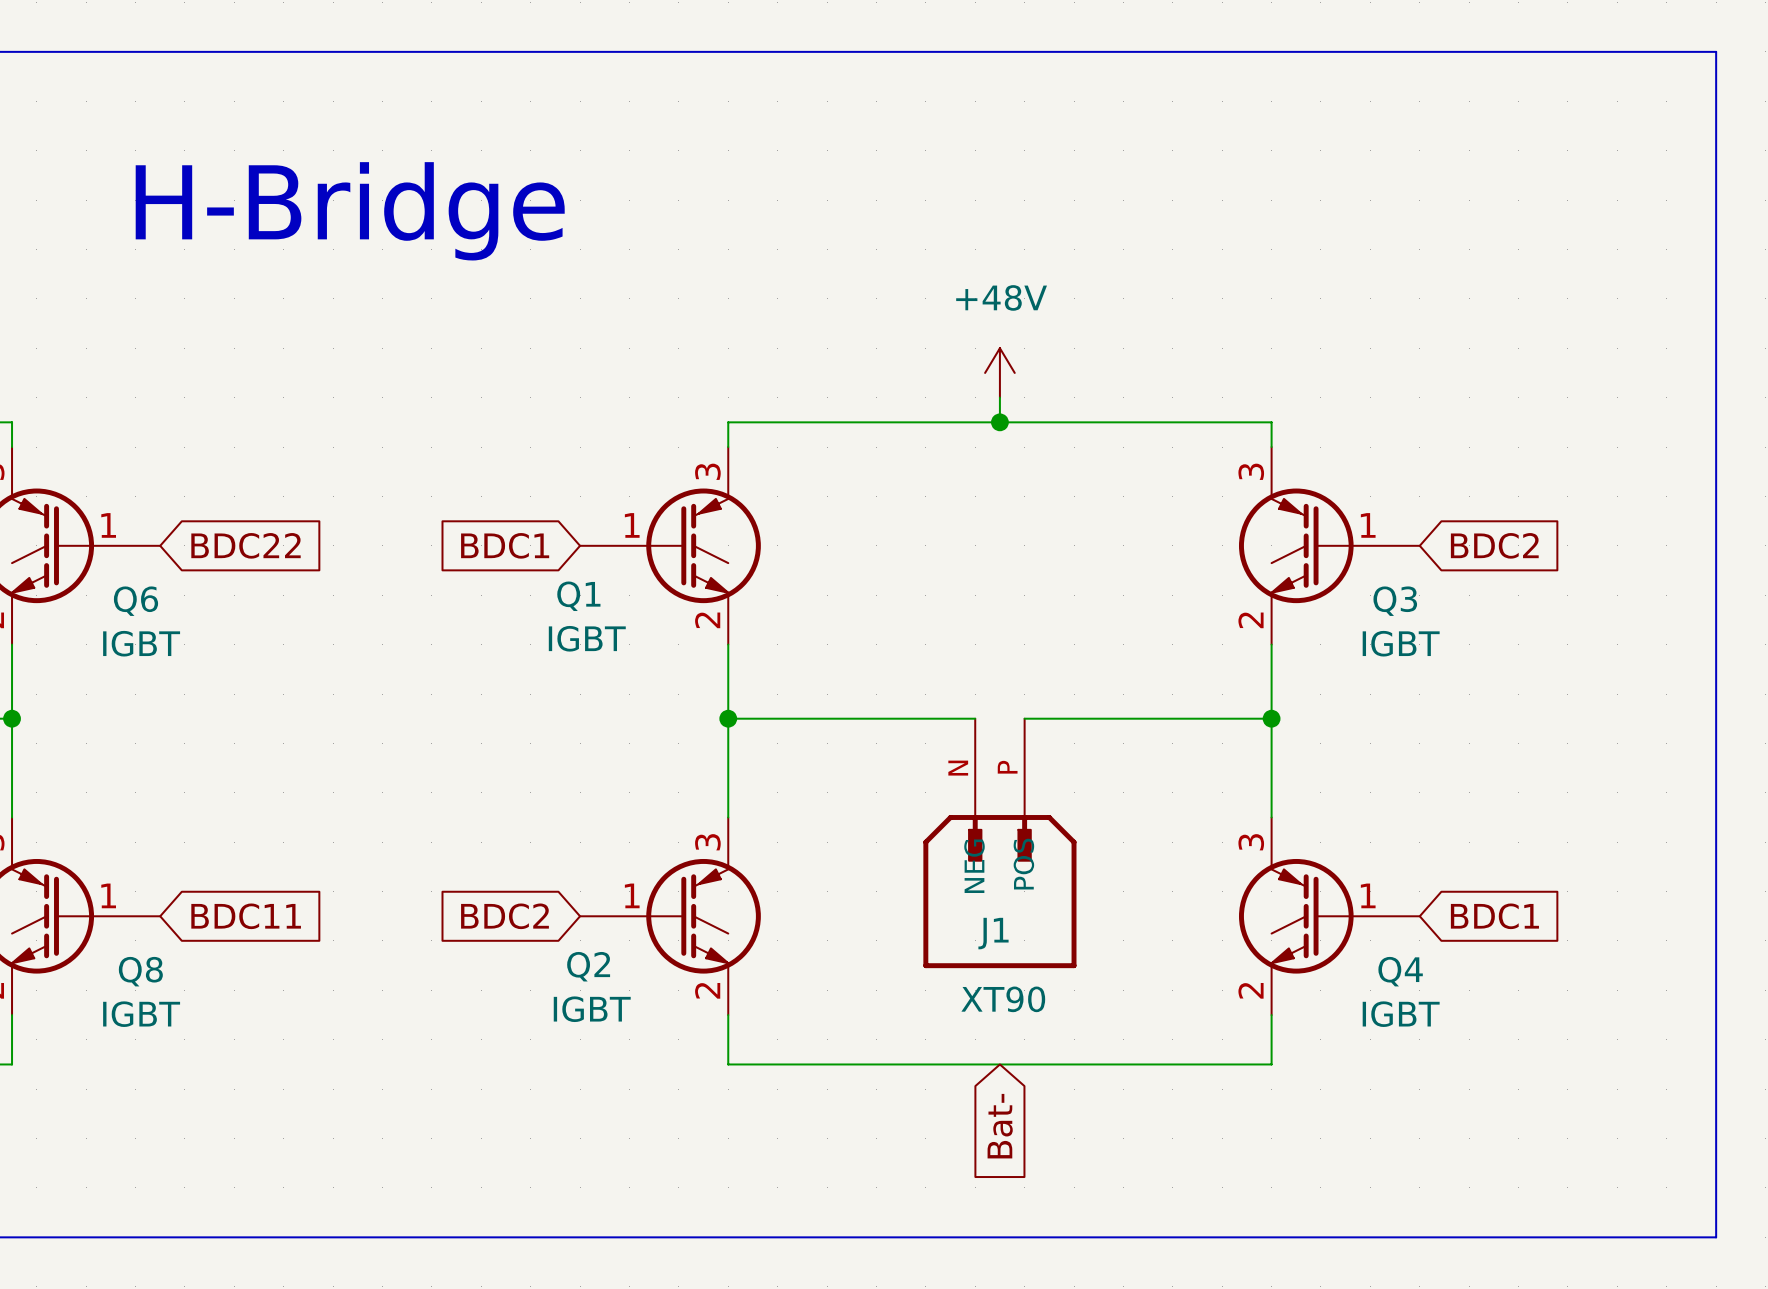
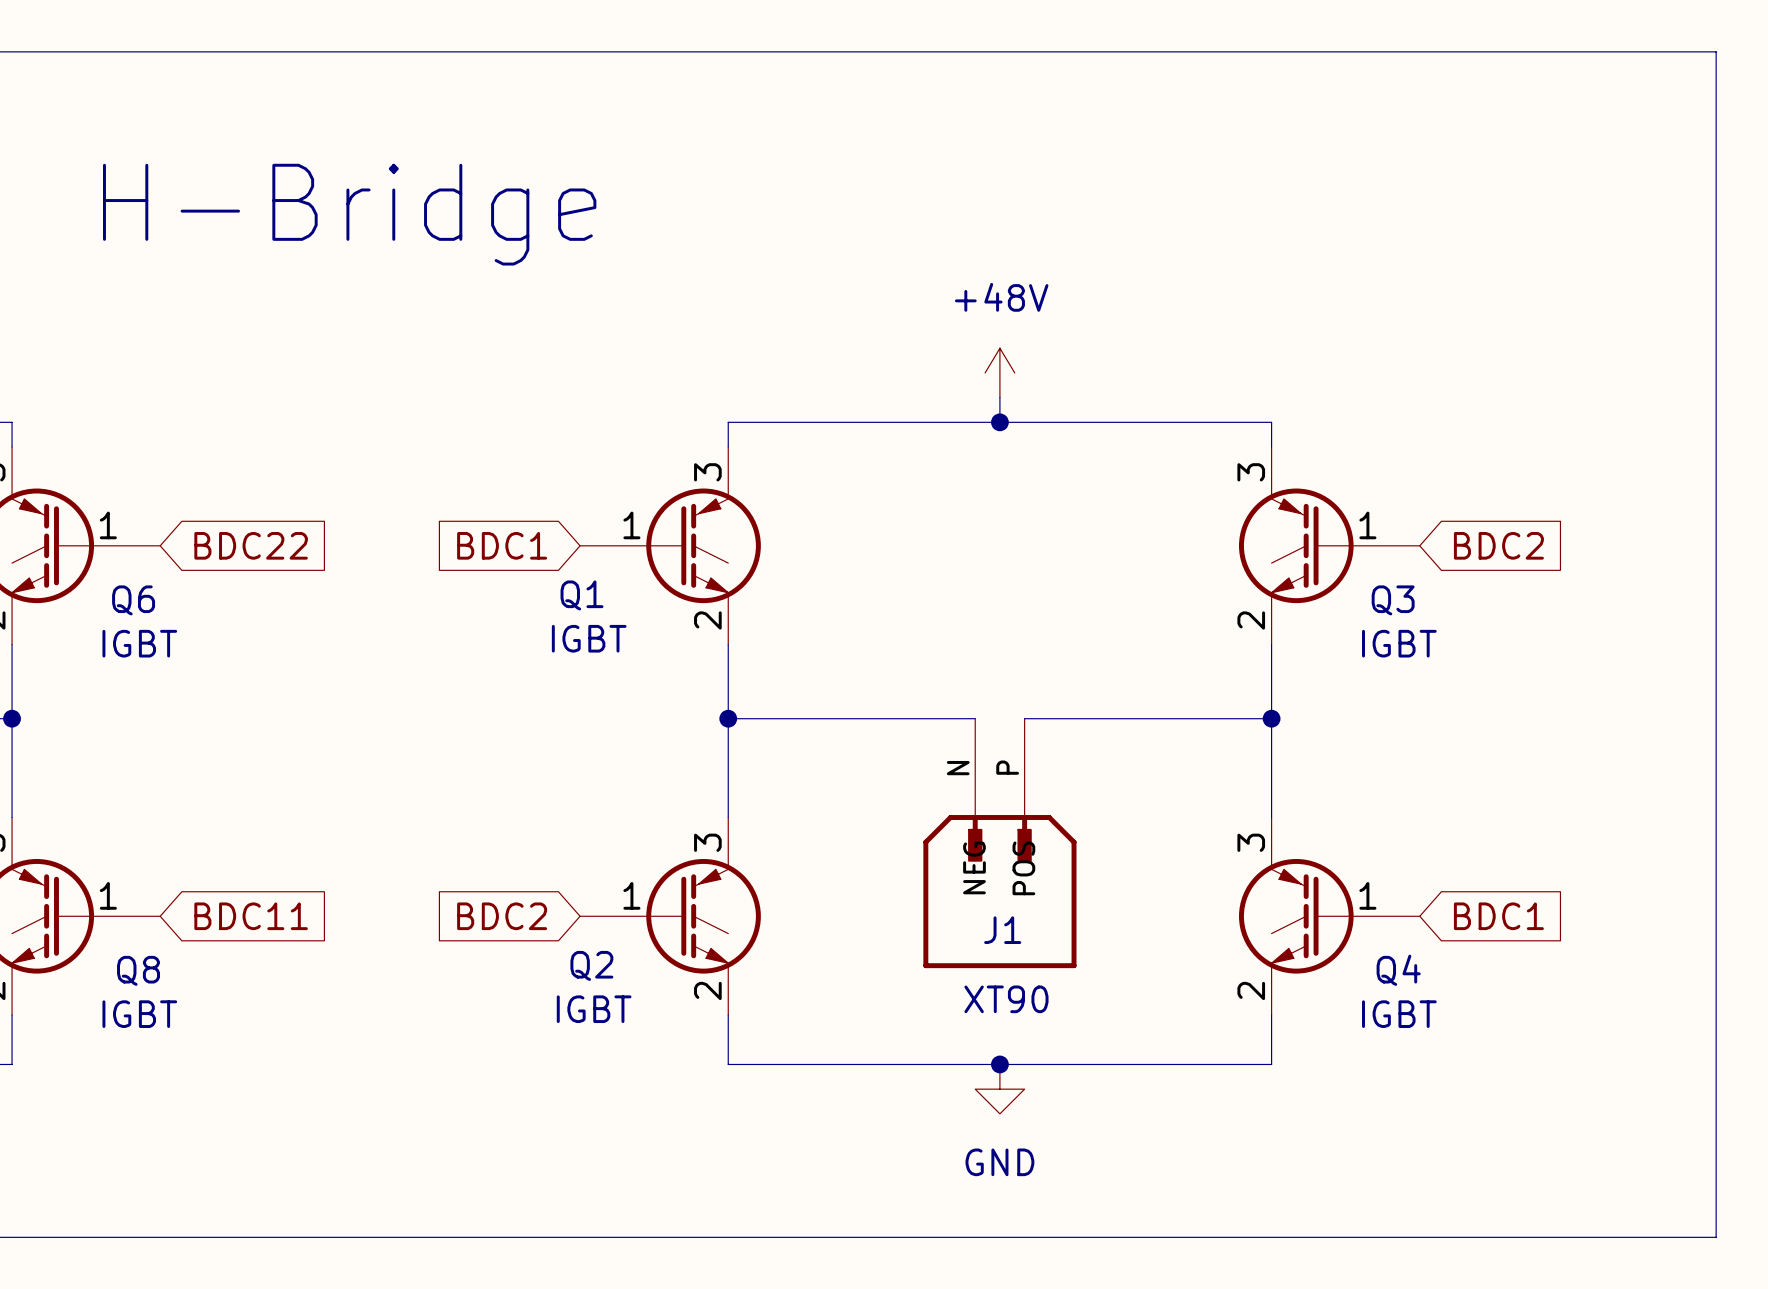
junction: none -> (999, 1064)
power symbol: none -> GND (999, 1089)
global label: Bat- (1000, 1126) -> none

